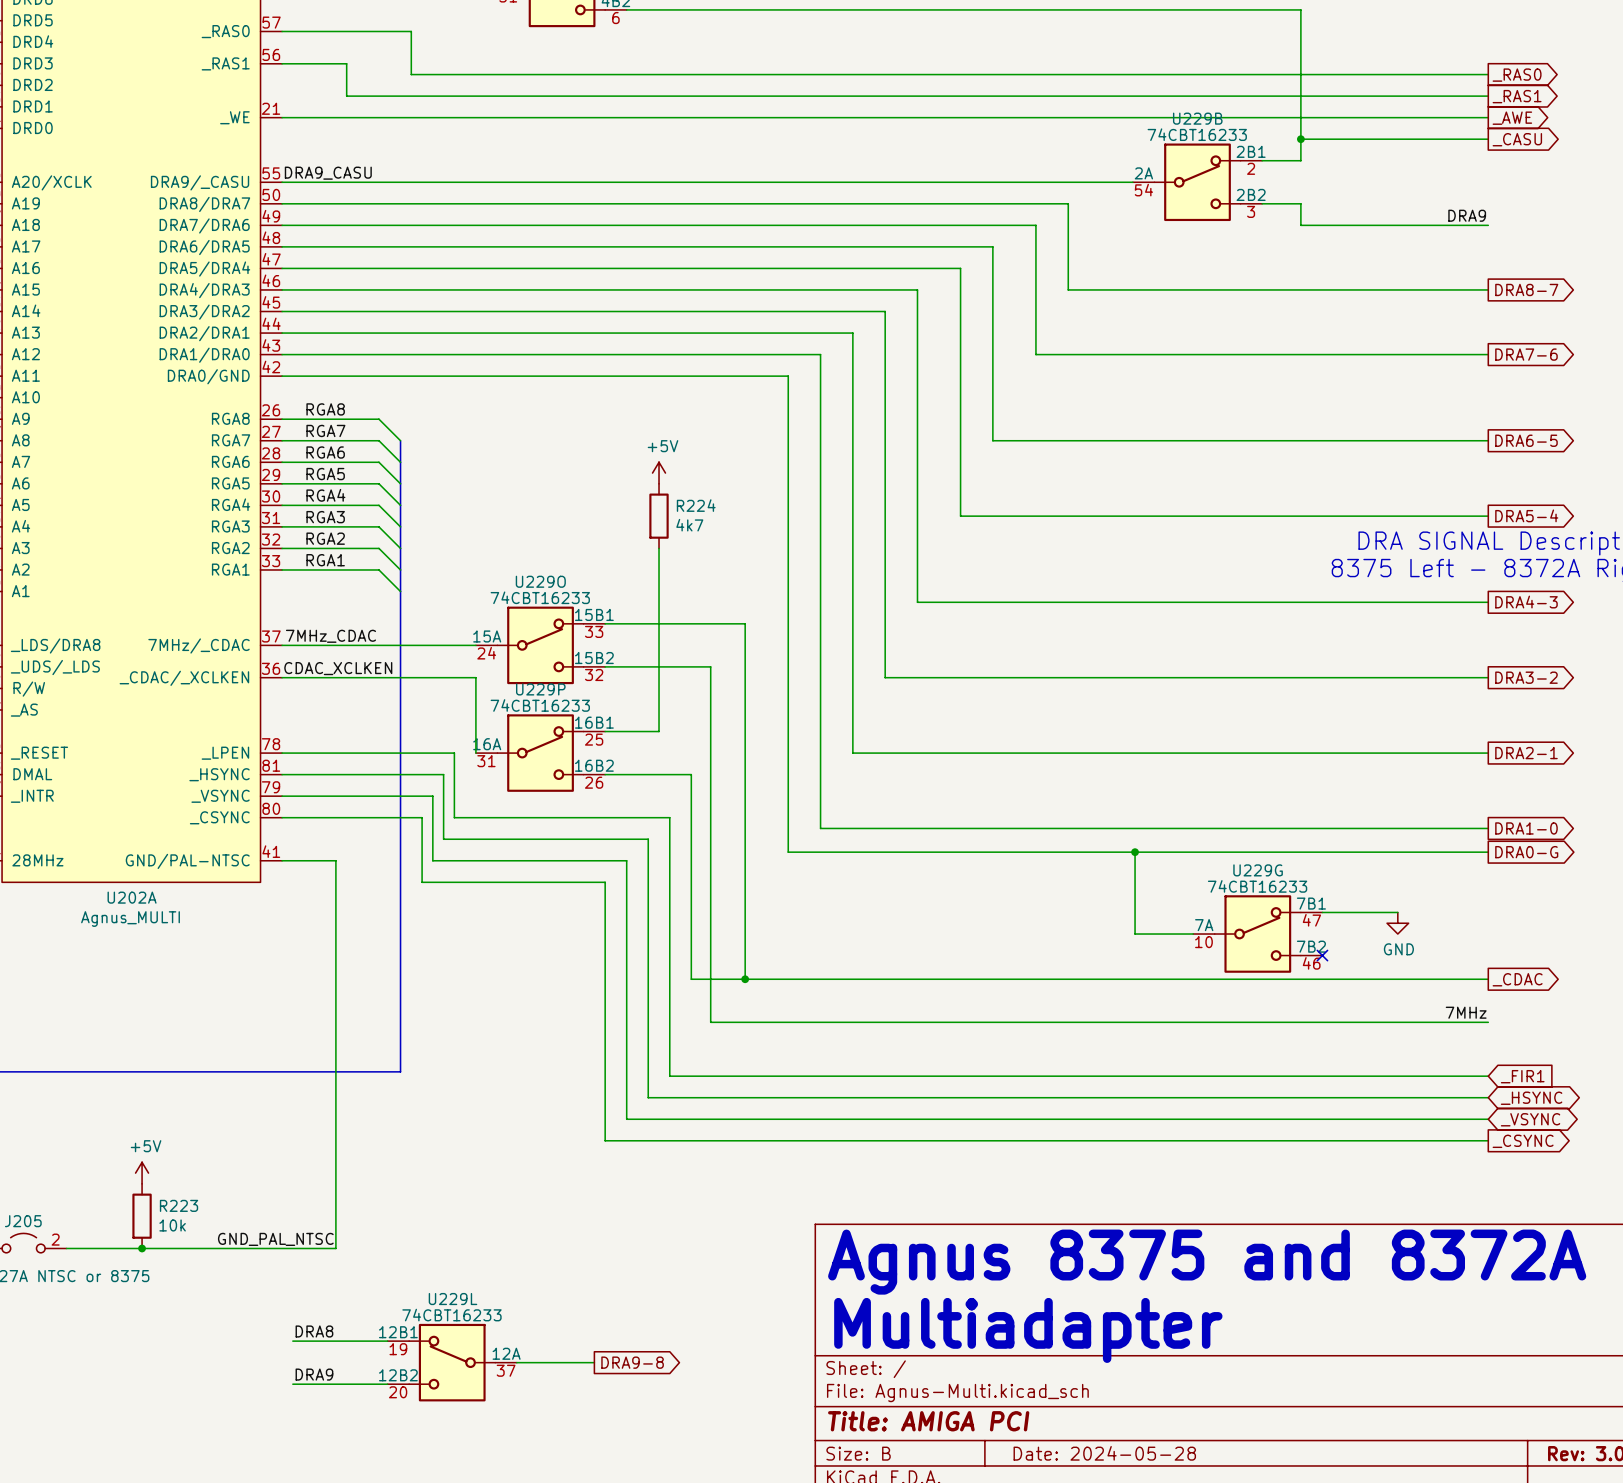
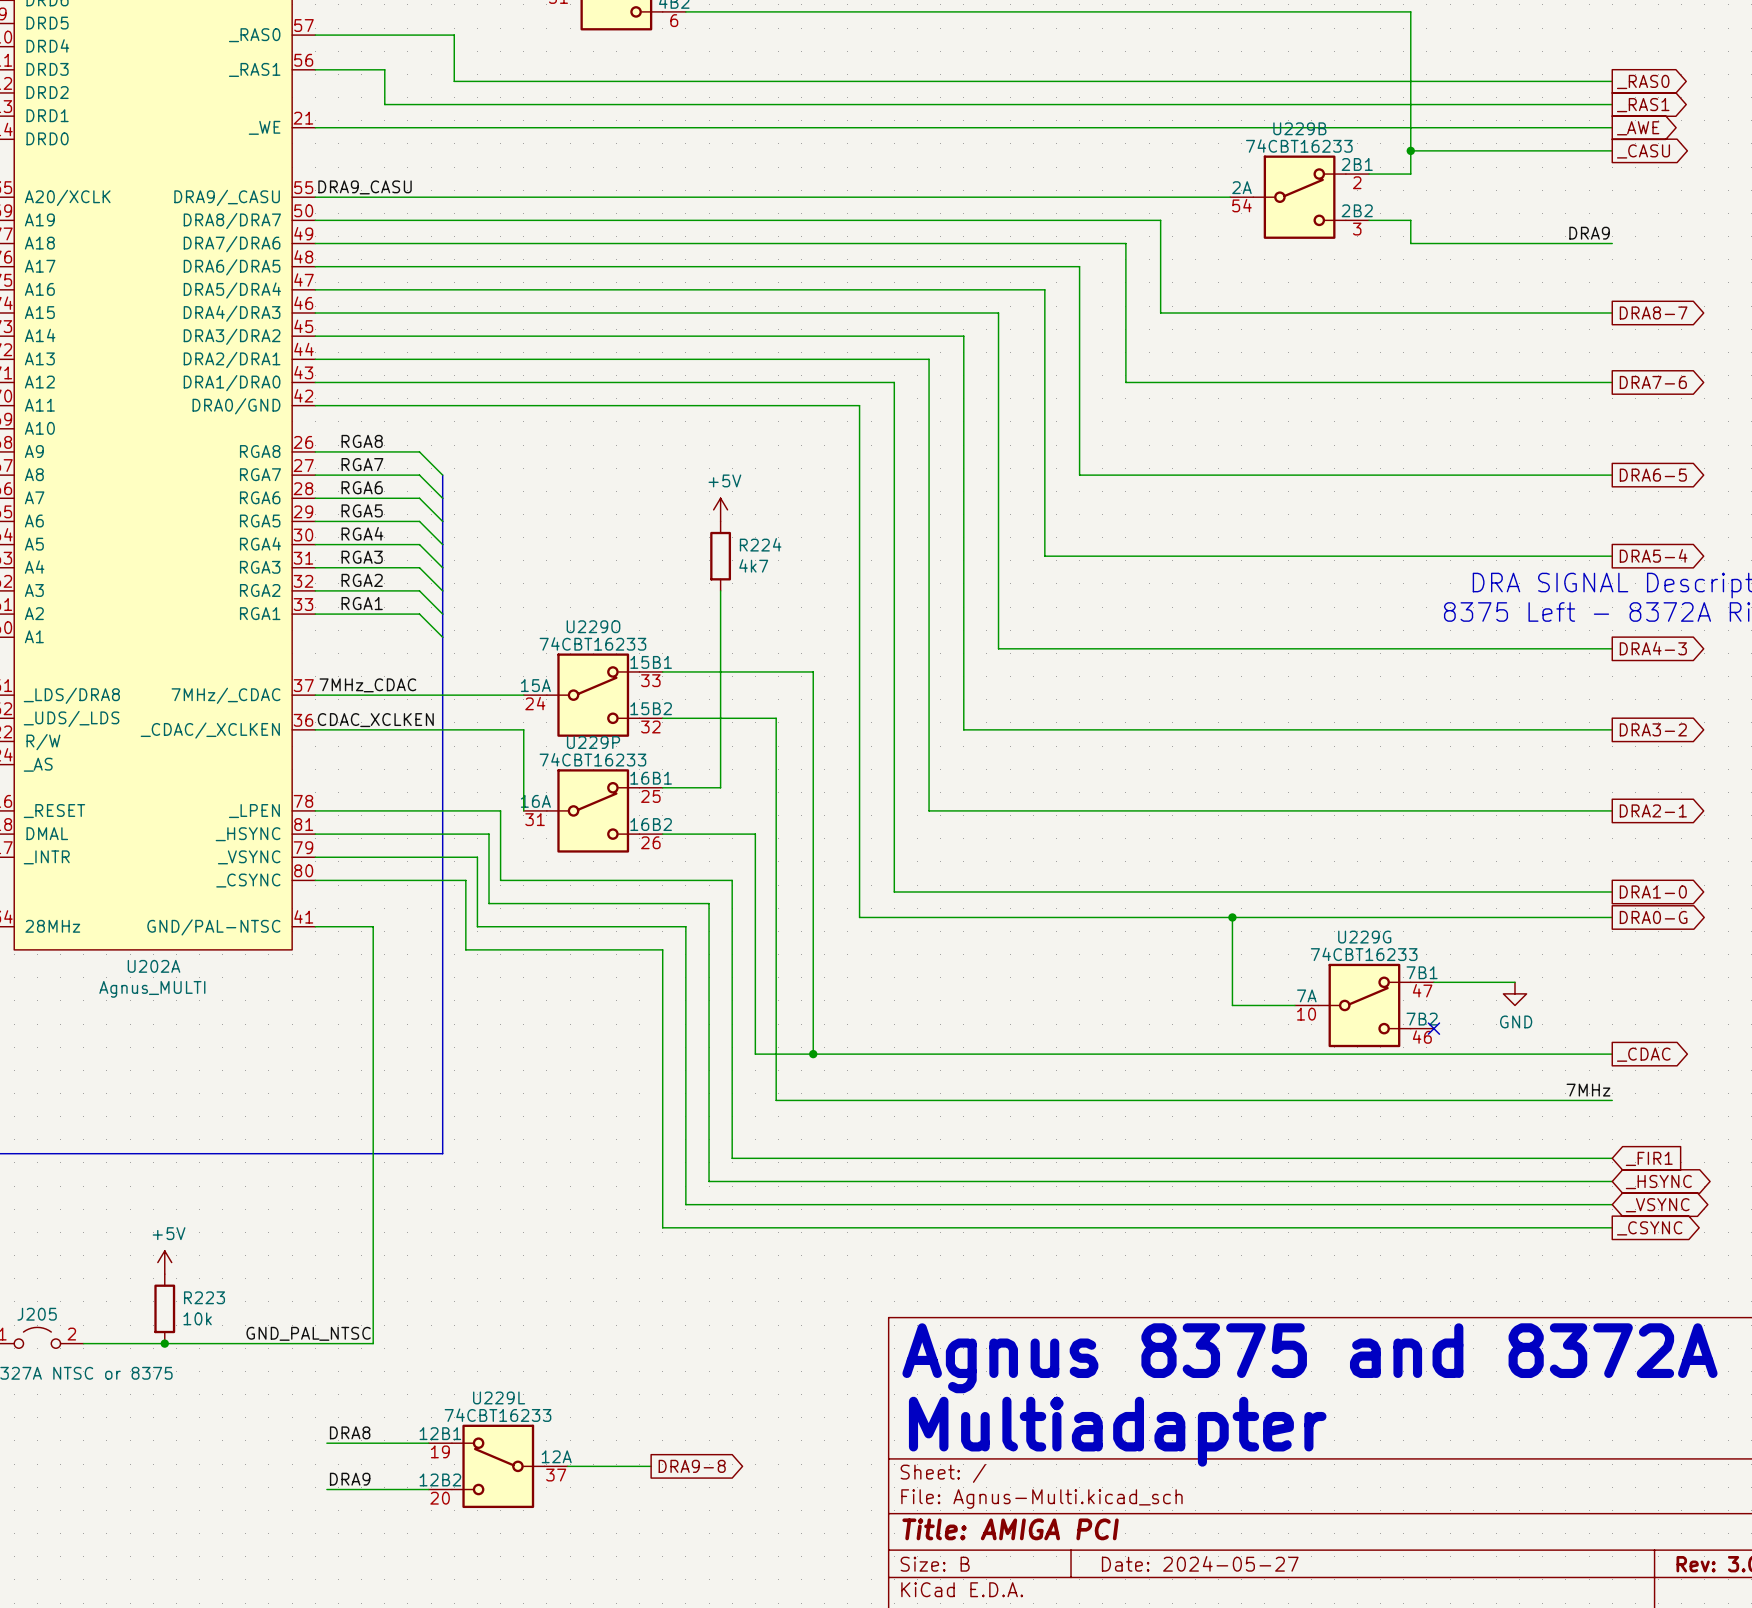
title block: Date: 2024-05-28 (1104, 1453) -> Date: 2024-05-27 (1200, 1563)

